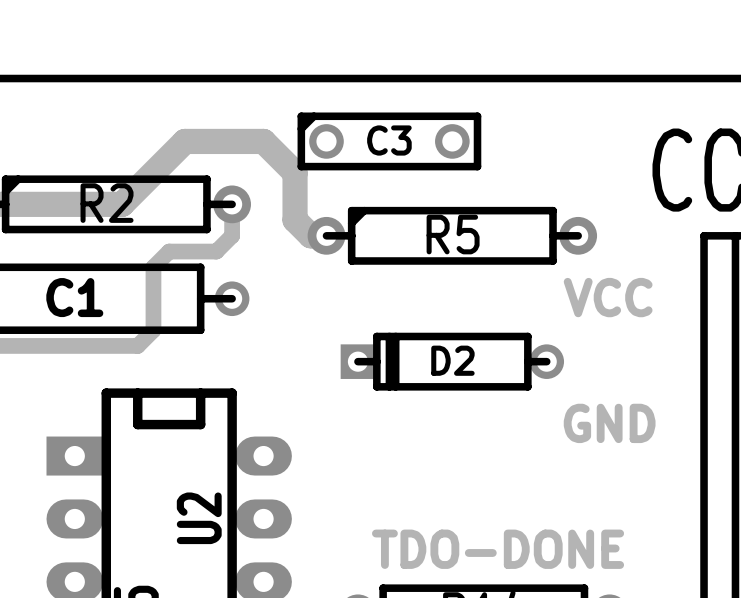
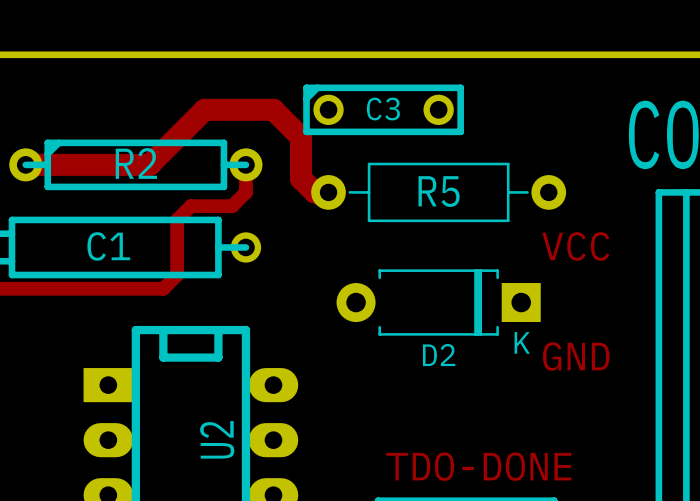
R5 footprint: [307, 206, 598, 265] -> [311, 162, 567, 223]
D2 footprint: [340, 332, 565, 391] -> [336, 269, 541, 336]
D2 name position: D2 (452, 360) -> D2 (439, 355)

